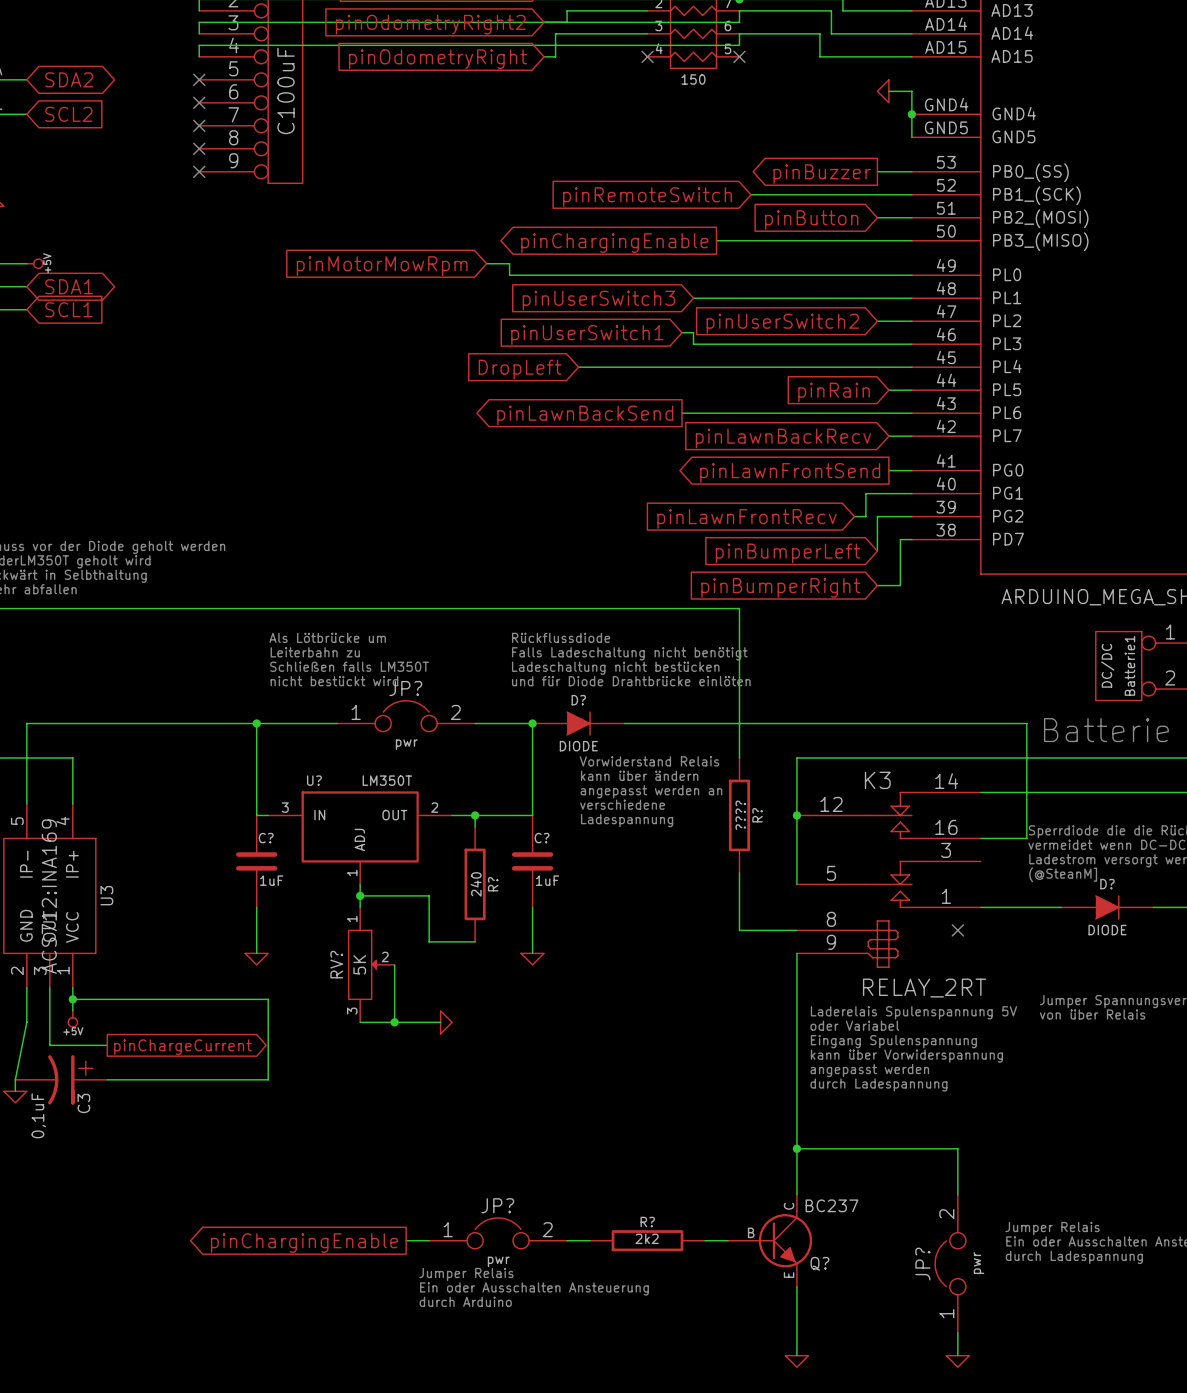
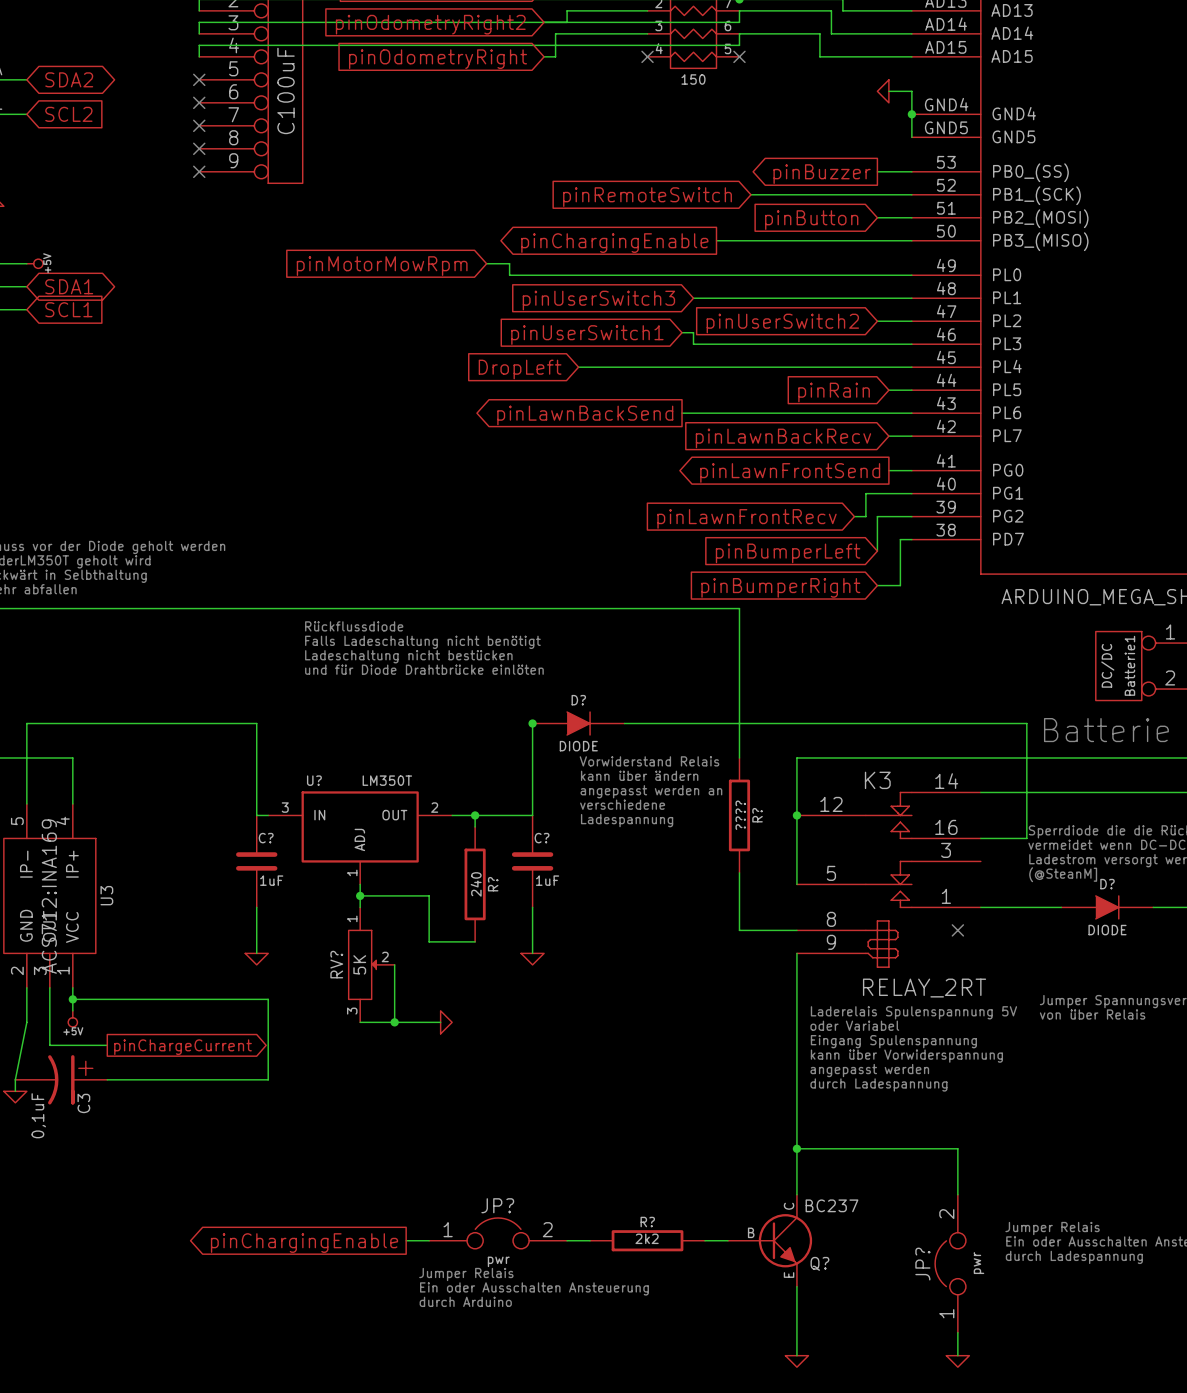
text: Als Lötbrücke um (327, 637) -> none
text position: Rückflussdiode (561, 637) -> Rückflussdiode (354, 626)
text: Leiterbahn zu (315, 652) -> none
text position: Falls Ladeschaltung nicht benötigt (629, 653) -> Falls Ladeschaltung nicht benötigt (422, 642)
text: Schließen falls LM350T (349, 666) -> none
text position: Ladeschaltung nicht bestücken (615, 668) -> Ladeschaltung nicht bestücken (408, 656)
text: nicht bestückt wird (334, 681) -> none
text position: und für Diode Drahtbrücke einlöten (631, 681) -> und für Diode Drahtbrücke einlöten (424, 669)
JP?: pwr (406, 716) -> none
wire: (256, 723) (337, 723) -> none
junction: (256, 723) -> none
wire: (475, 723) (532, 723) -> none

